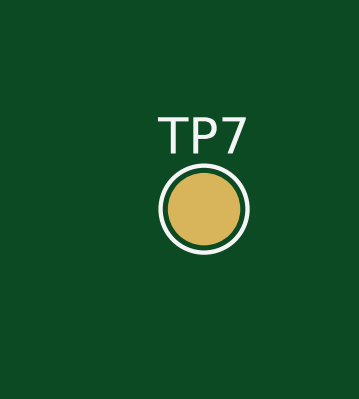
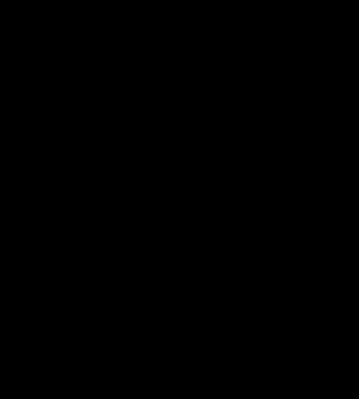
TP7: (204, 209) -> none

